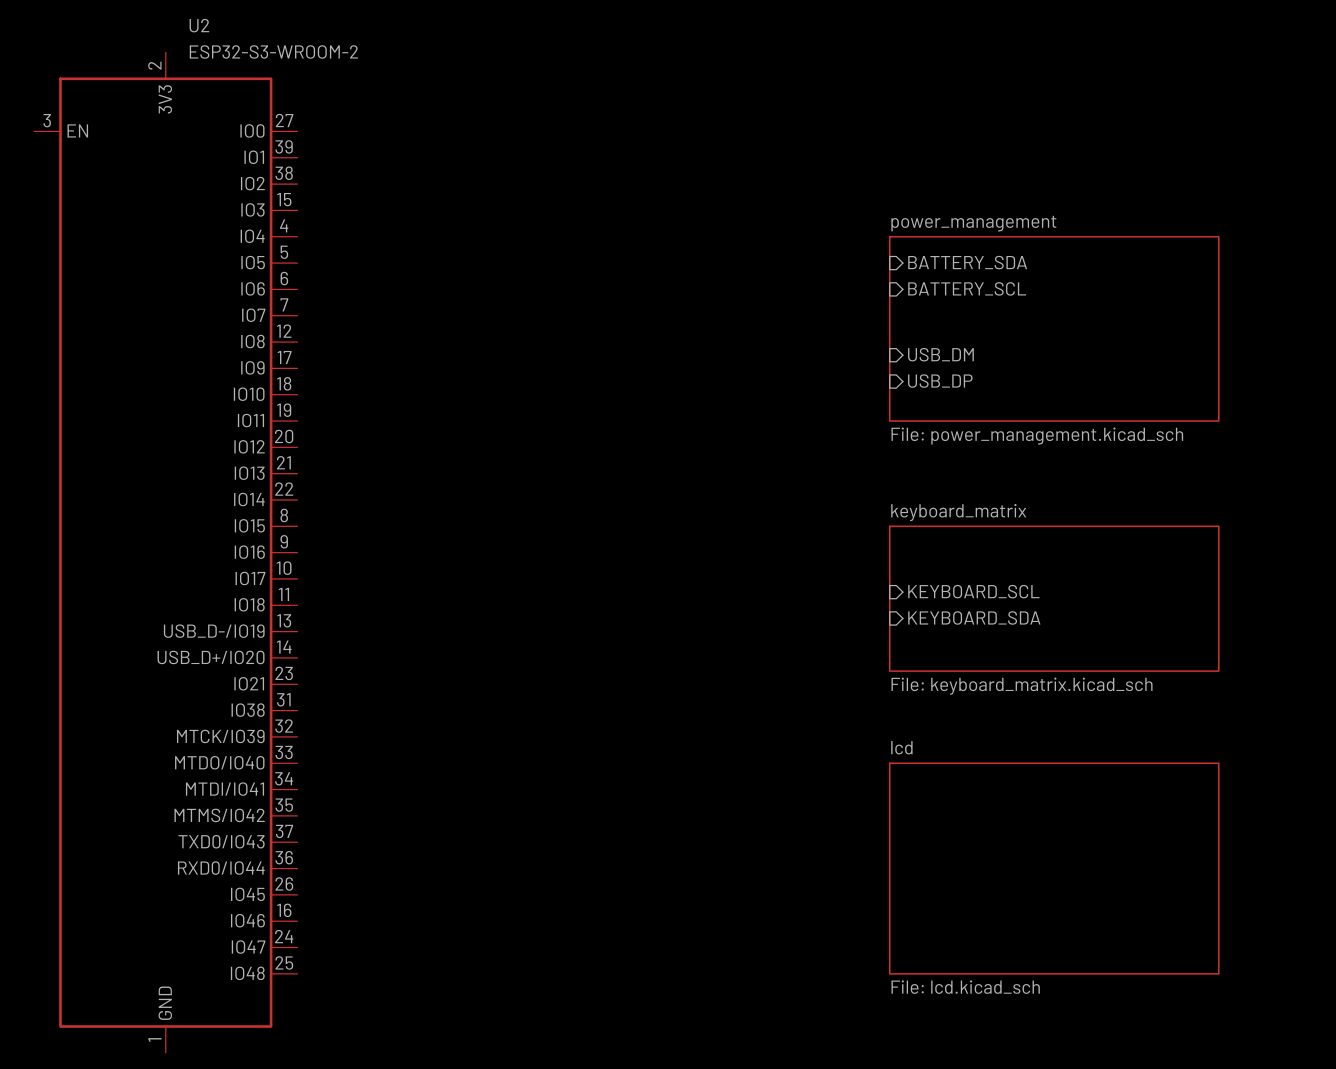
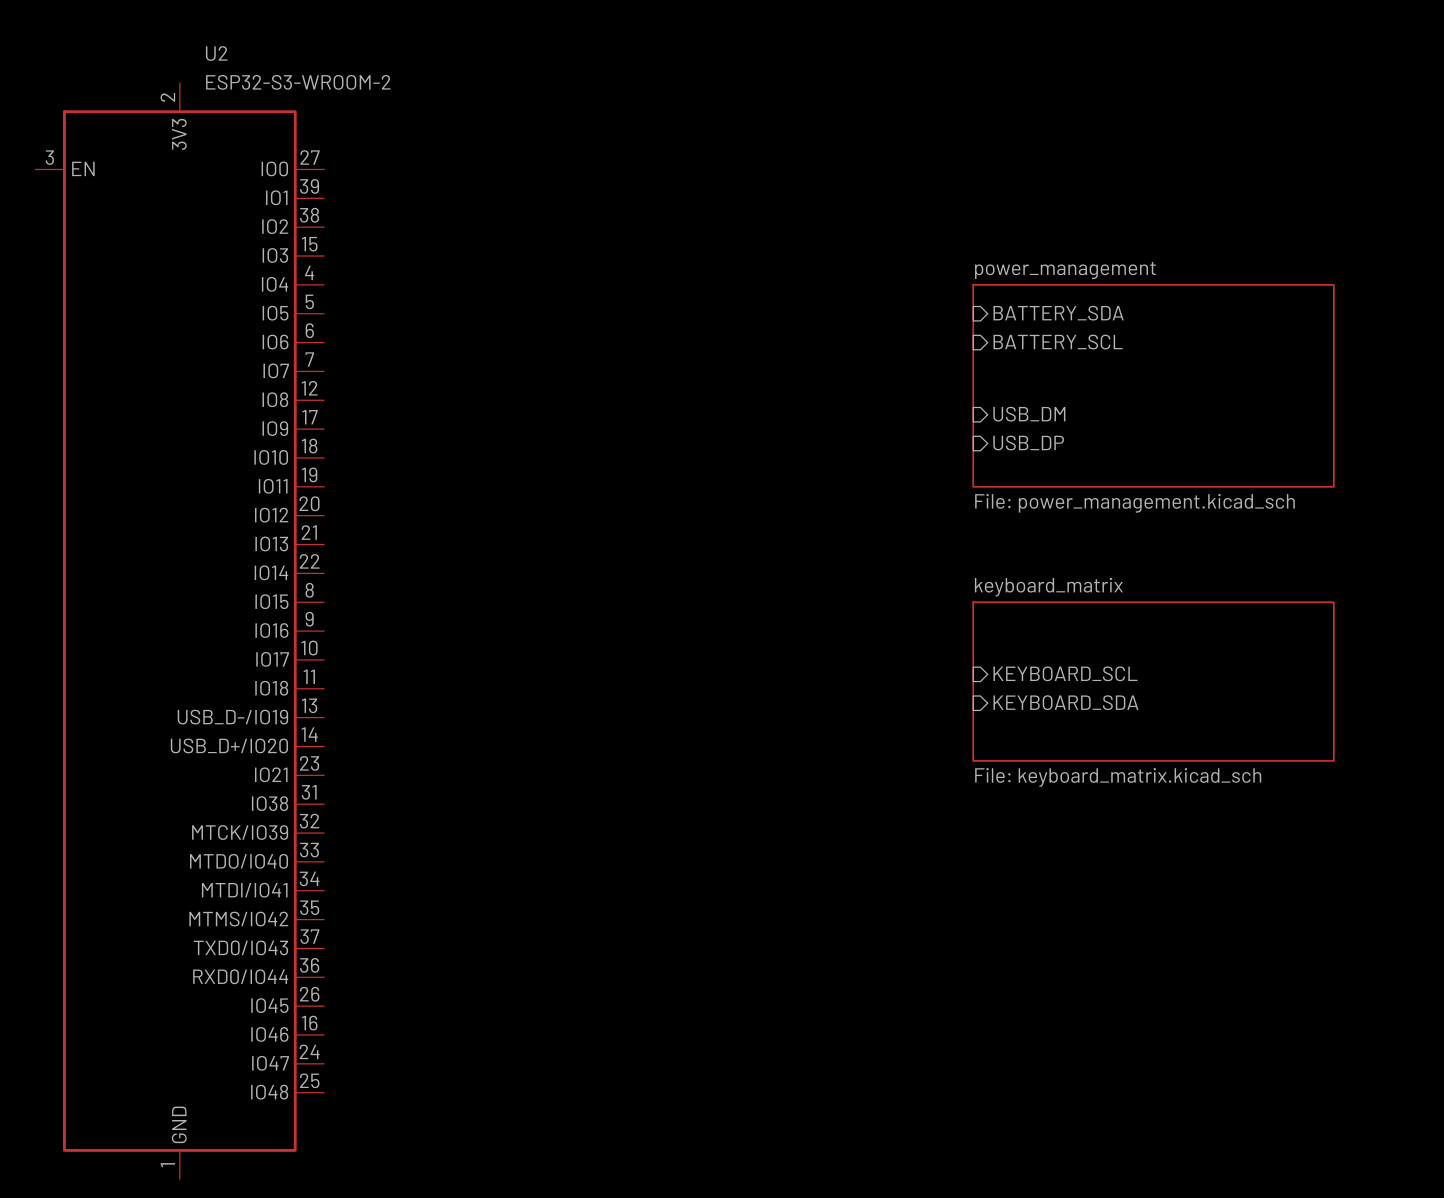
sheet lcd: File: lcd.kicad_sch (1054, 868) -> none

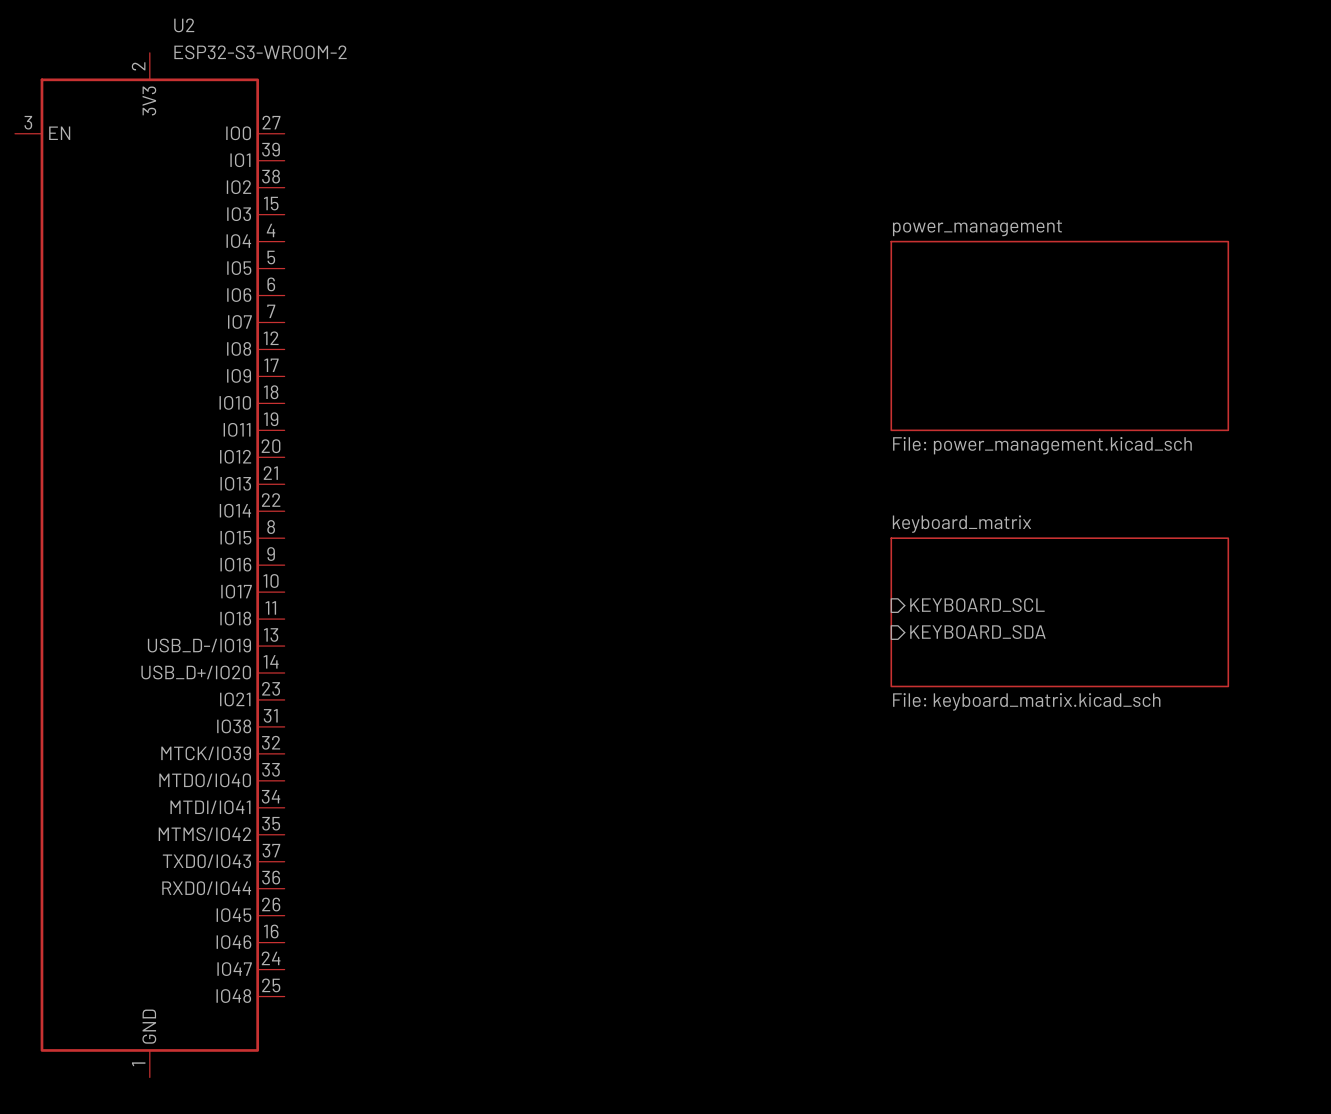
sheet pin: BATTERY_SDA (1058, 313) -> none
sheet pin: BATTERY_SCL (1058, 342) -> none
sheet pin: USB_DM (1029, 414) -> none
sheet pin: USB_DP (1028, 443) -> none

